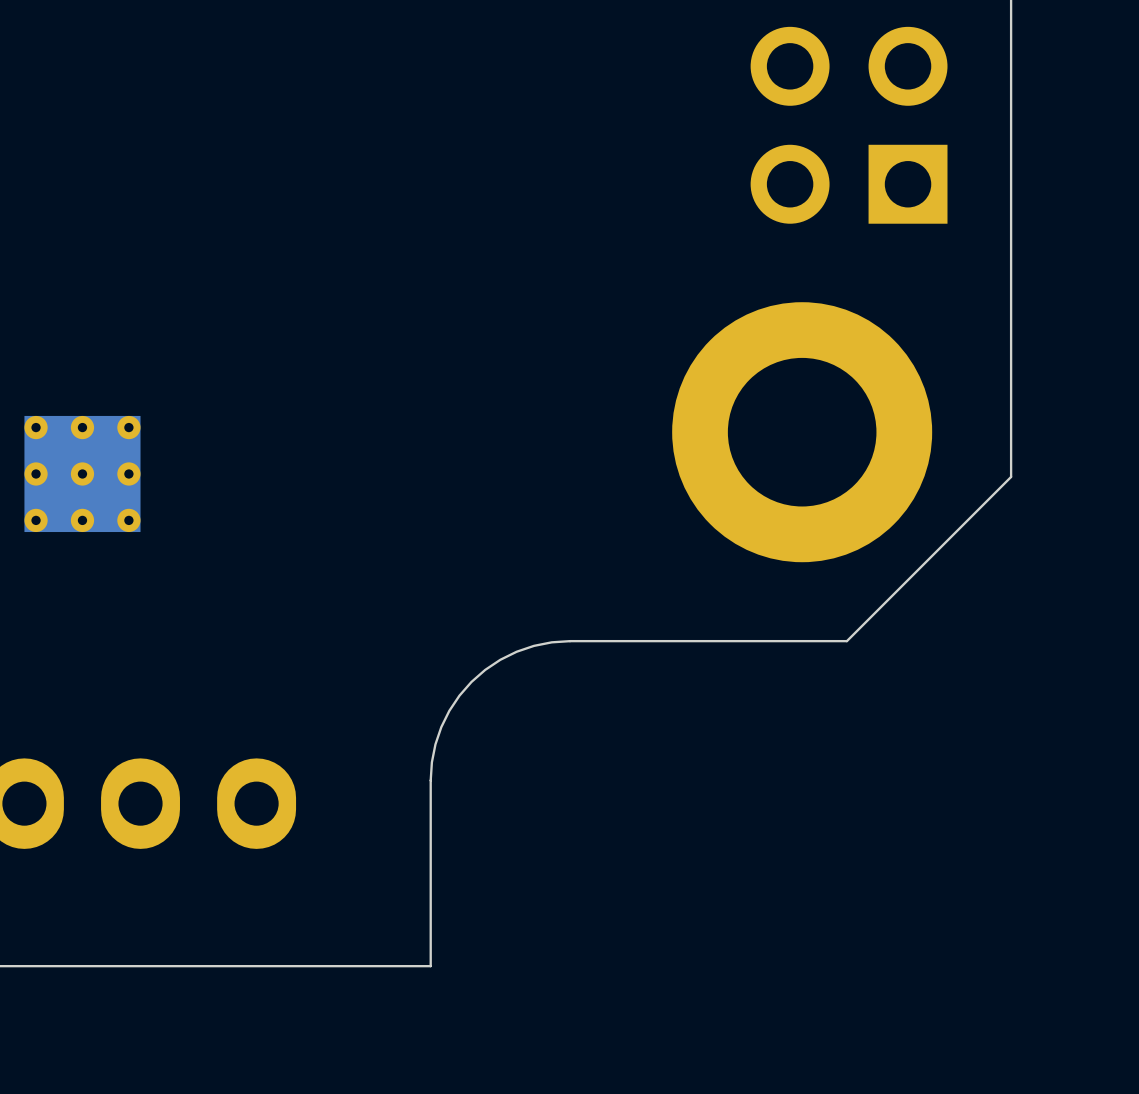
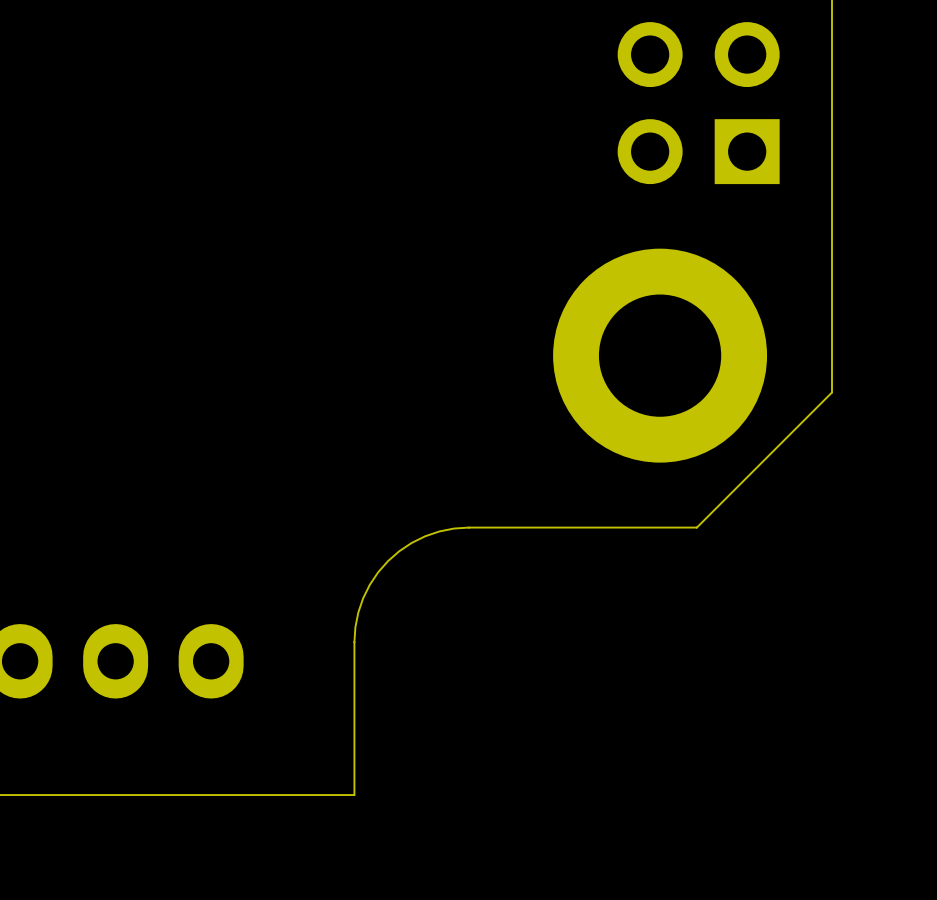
part: (82, 473) -> none

